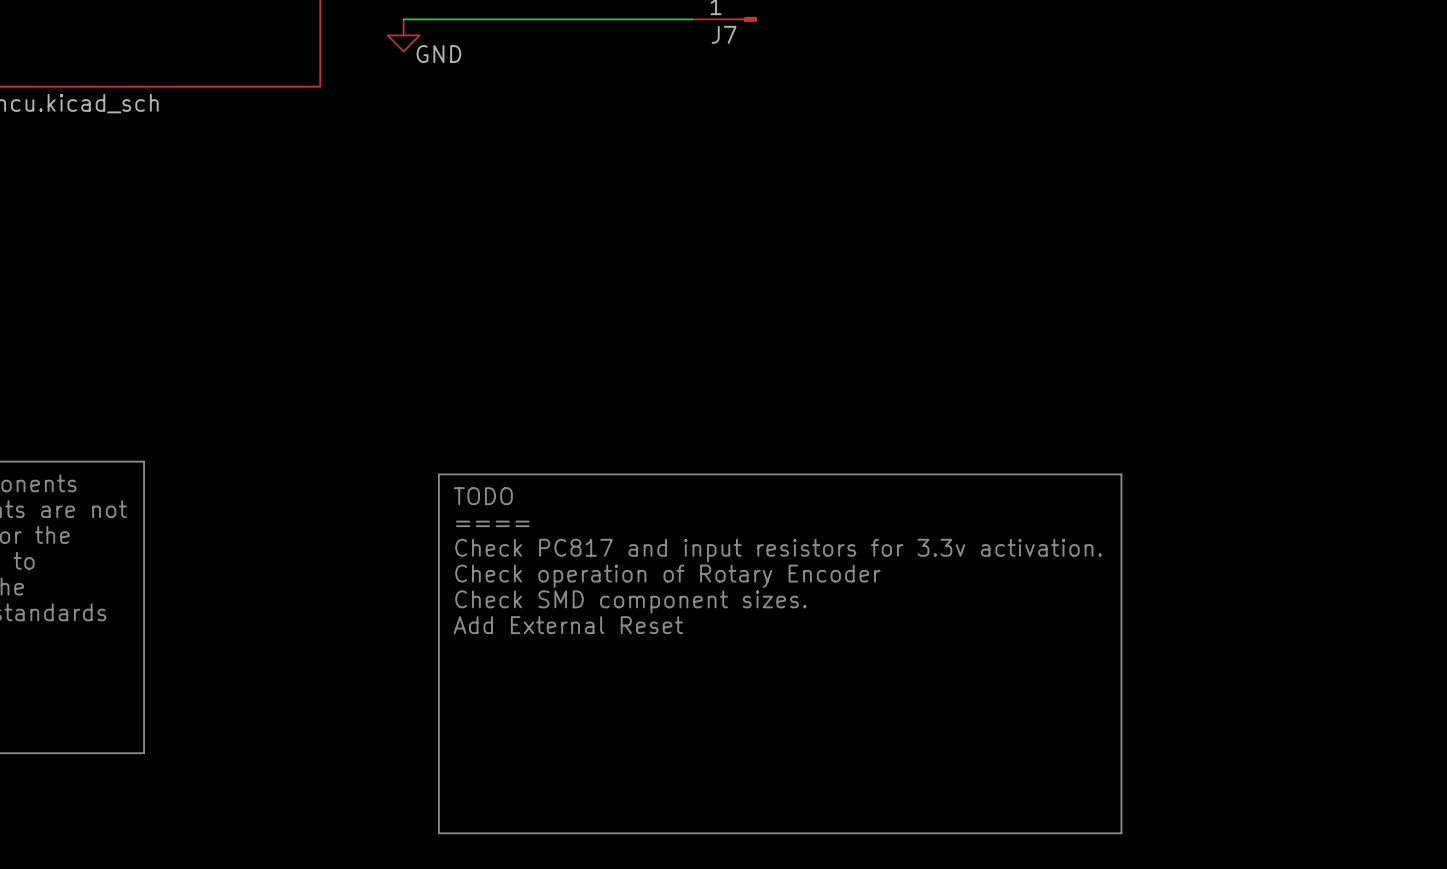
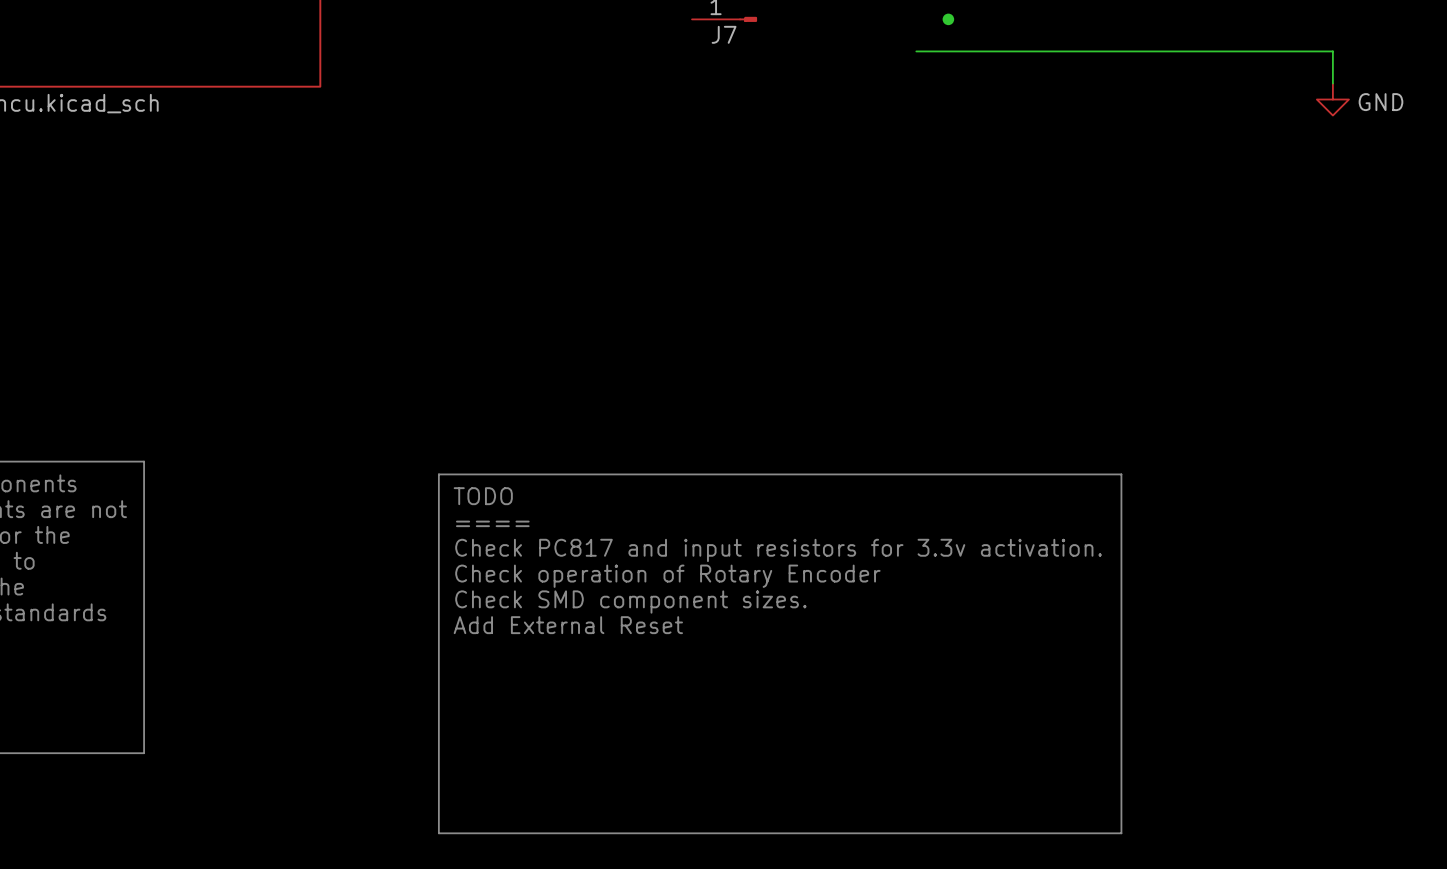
wire: (403, 19) (692, 19) -> none
junction: none -> (948, 19)
power symbol: GND (403, 35) -> none
wire: none -> (916, 51) (1332, 51) (1332, 83)
power symbol: none -> GND (1332, 99)

